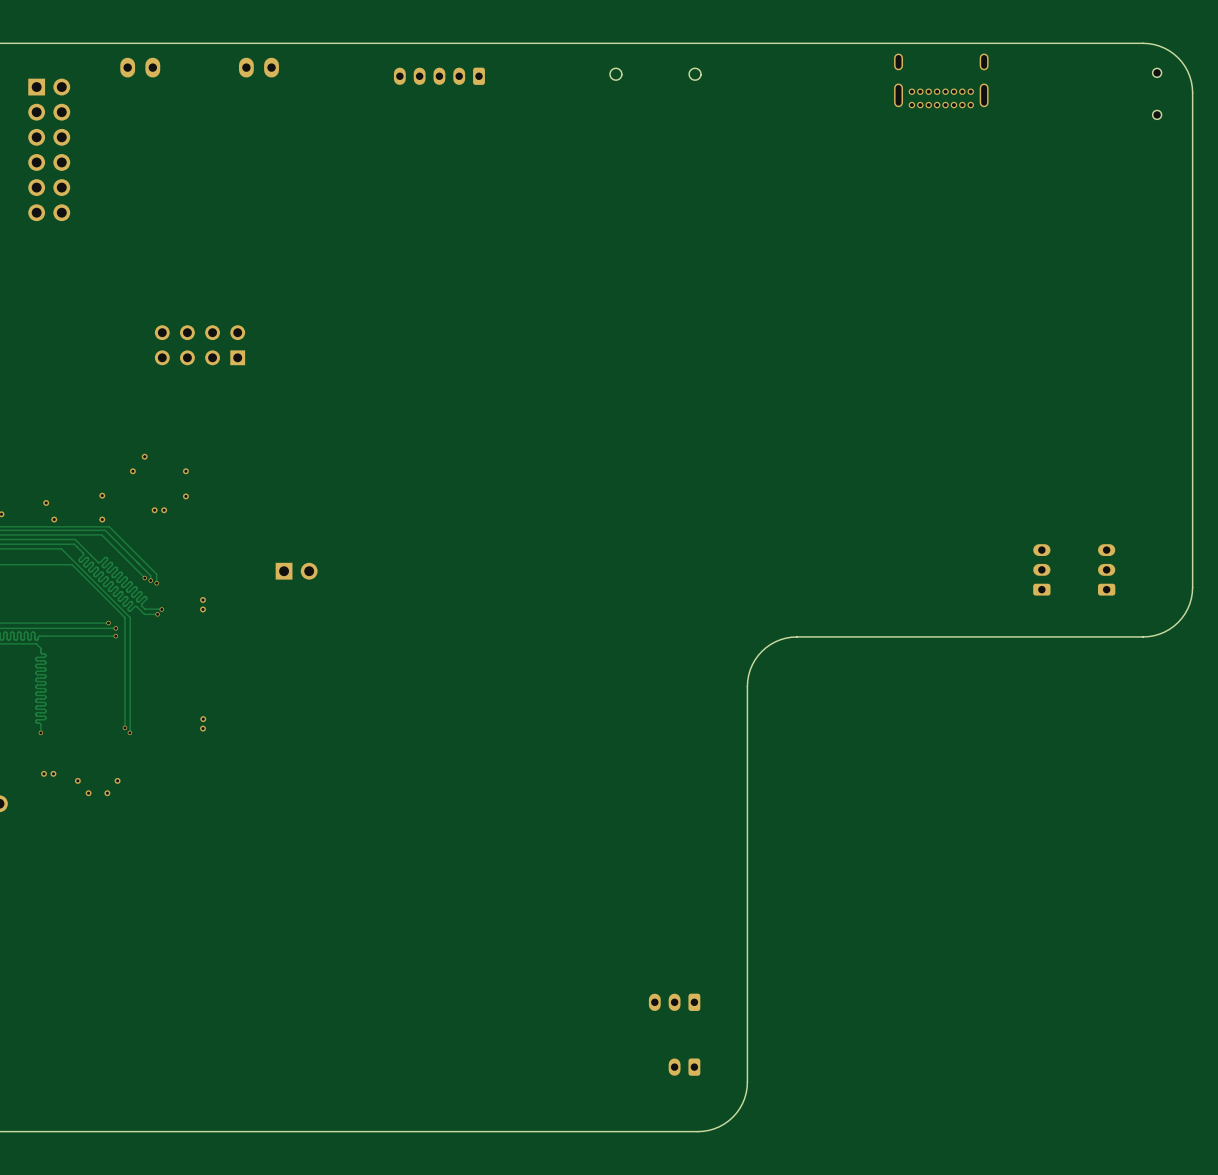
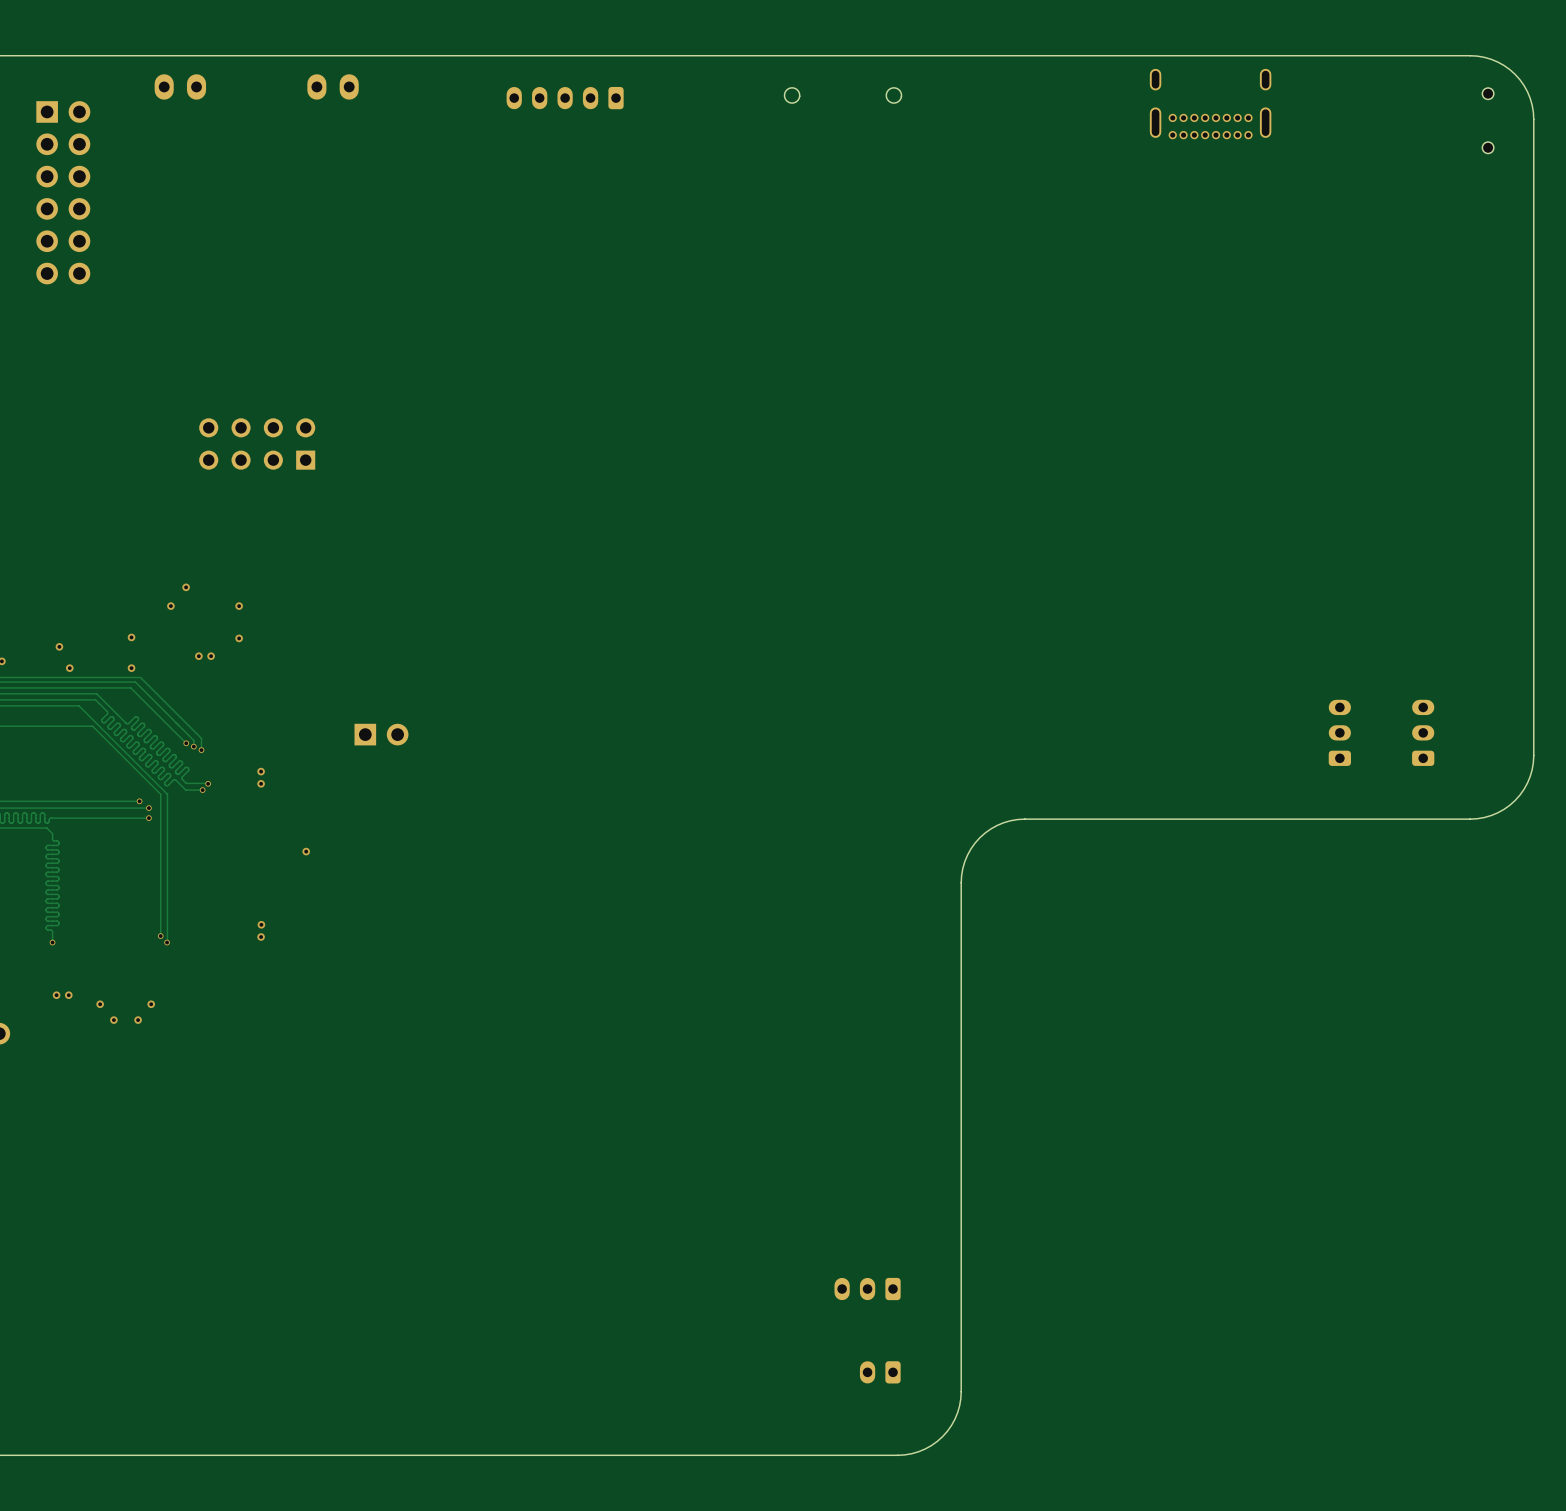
via: none -> (306, 851)

